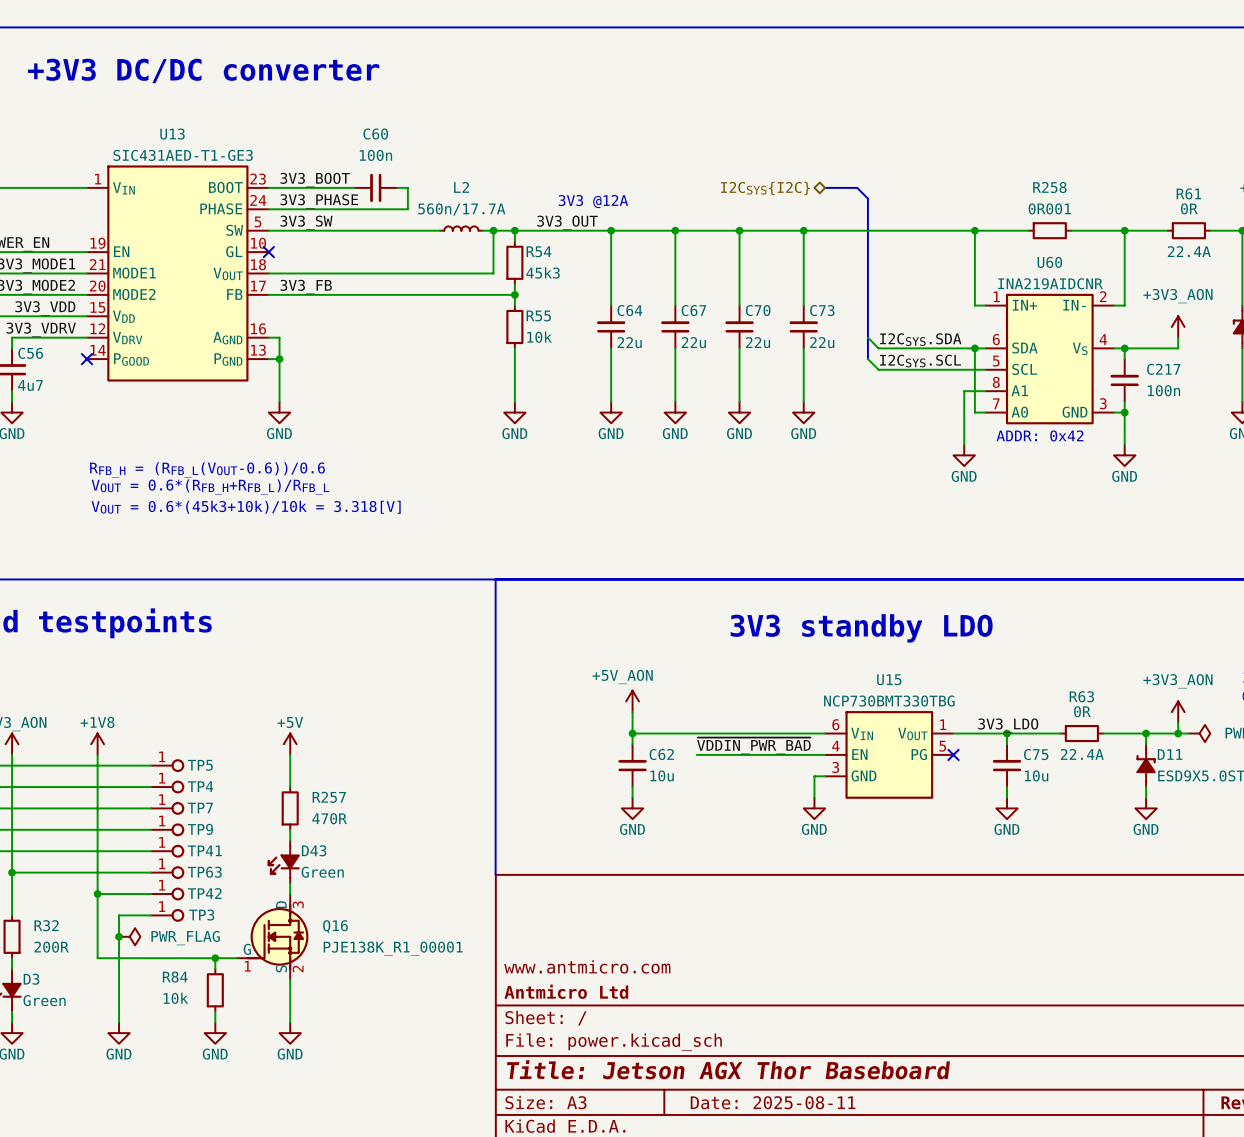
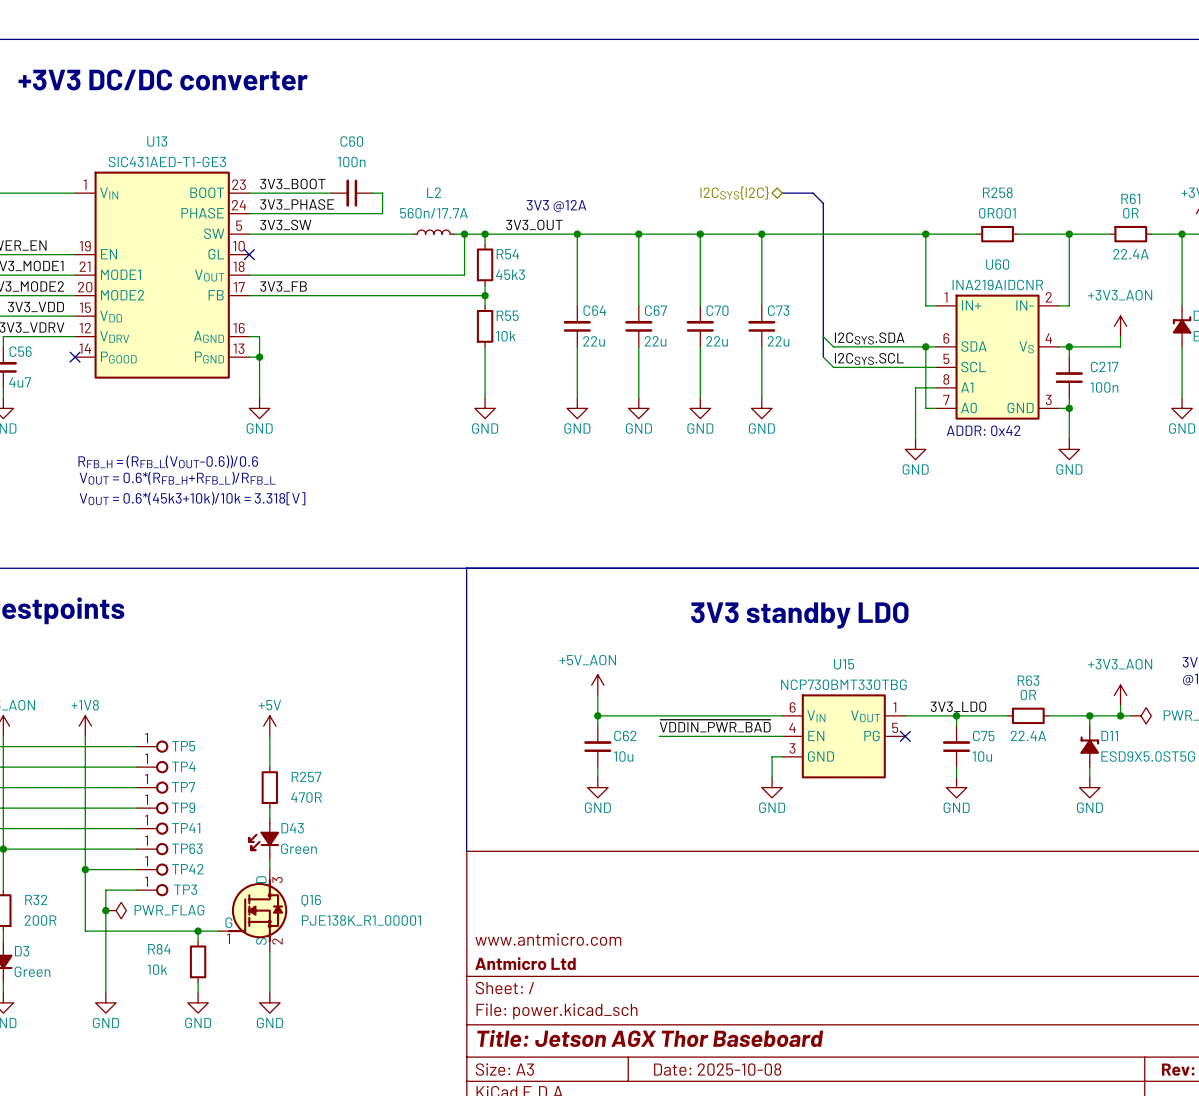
title block: Date: 2025-08-11 (773, 1102) -> Date: 2025-10-08 (717, 1069)

